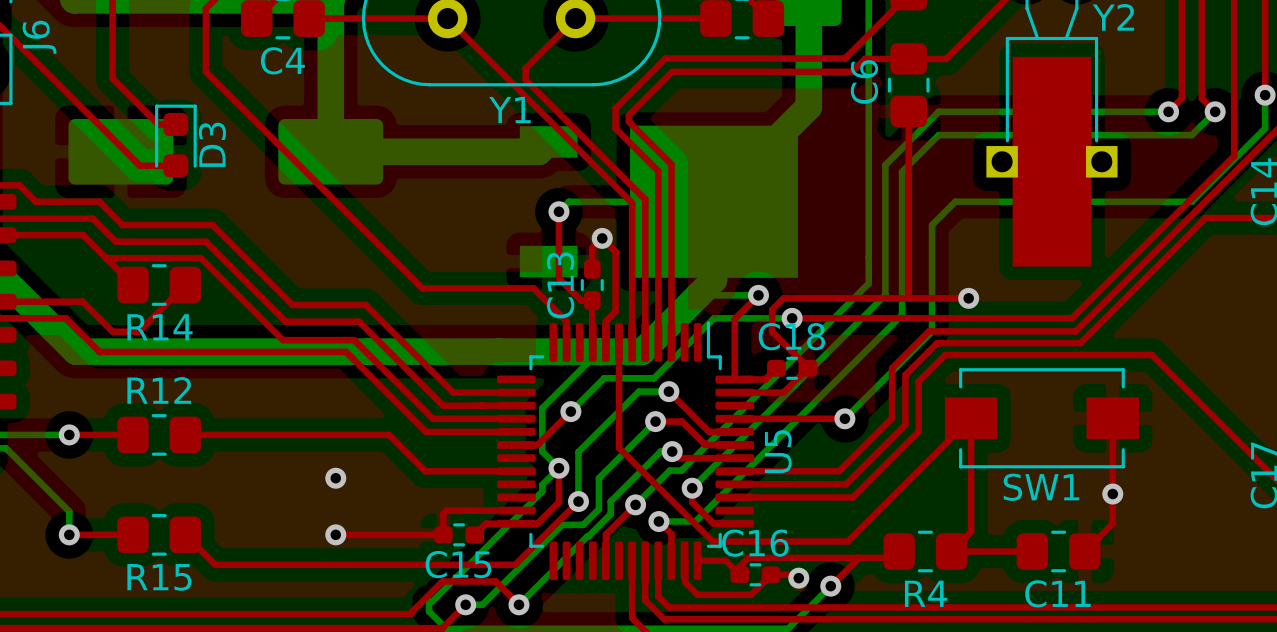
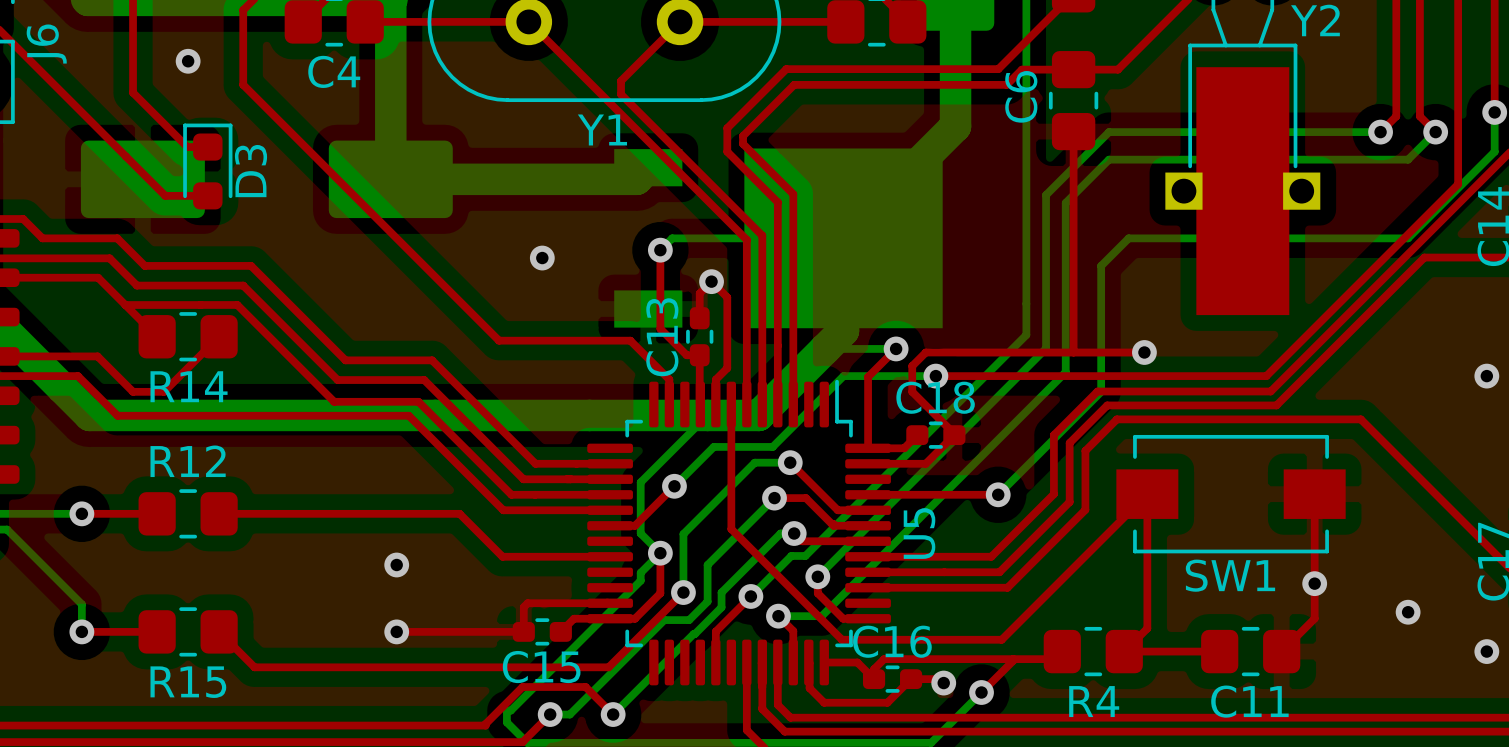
via: none -> (188, 61)
via: none -> (542, 258)
via: none -> (1486, 376)
via: none -> (1408, 612)
via: none -> (1486, 651)

